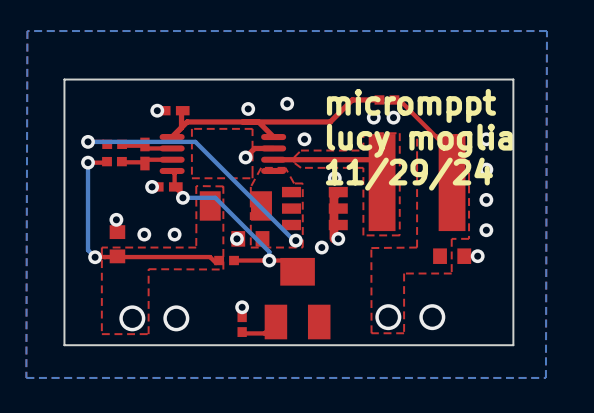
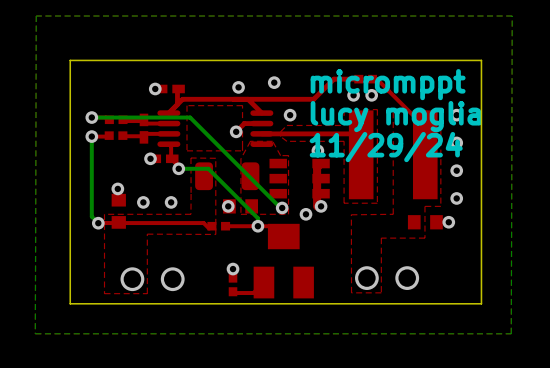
part footprint: [199, 191, 272, 221] -> [195, 162, 260, 191]

